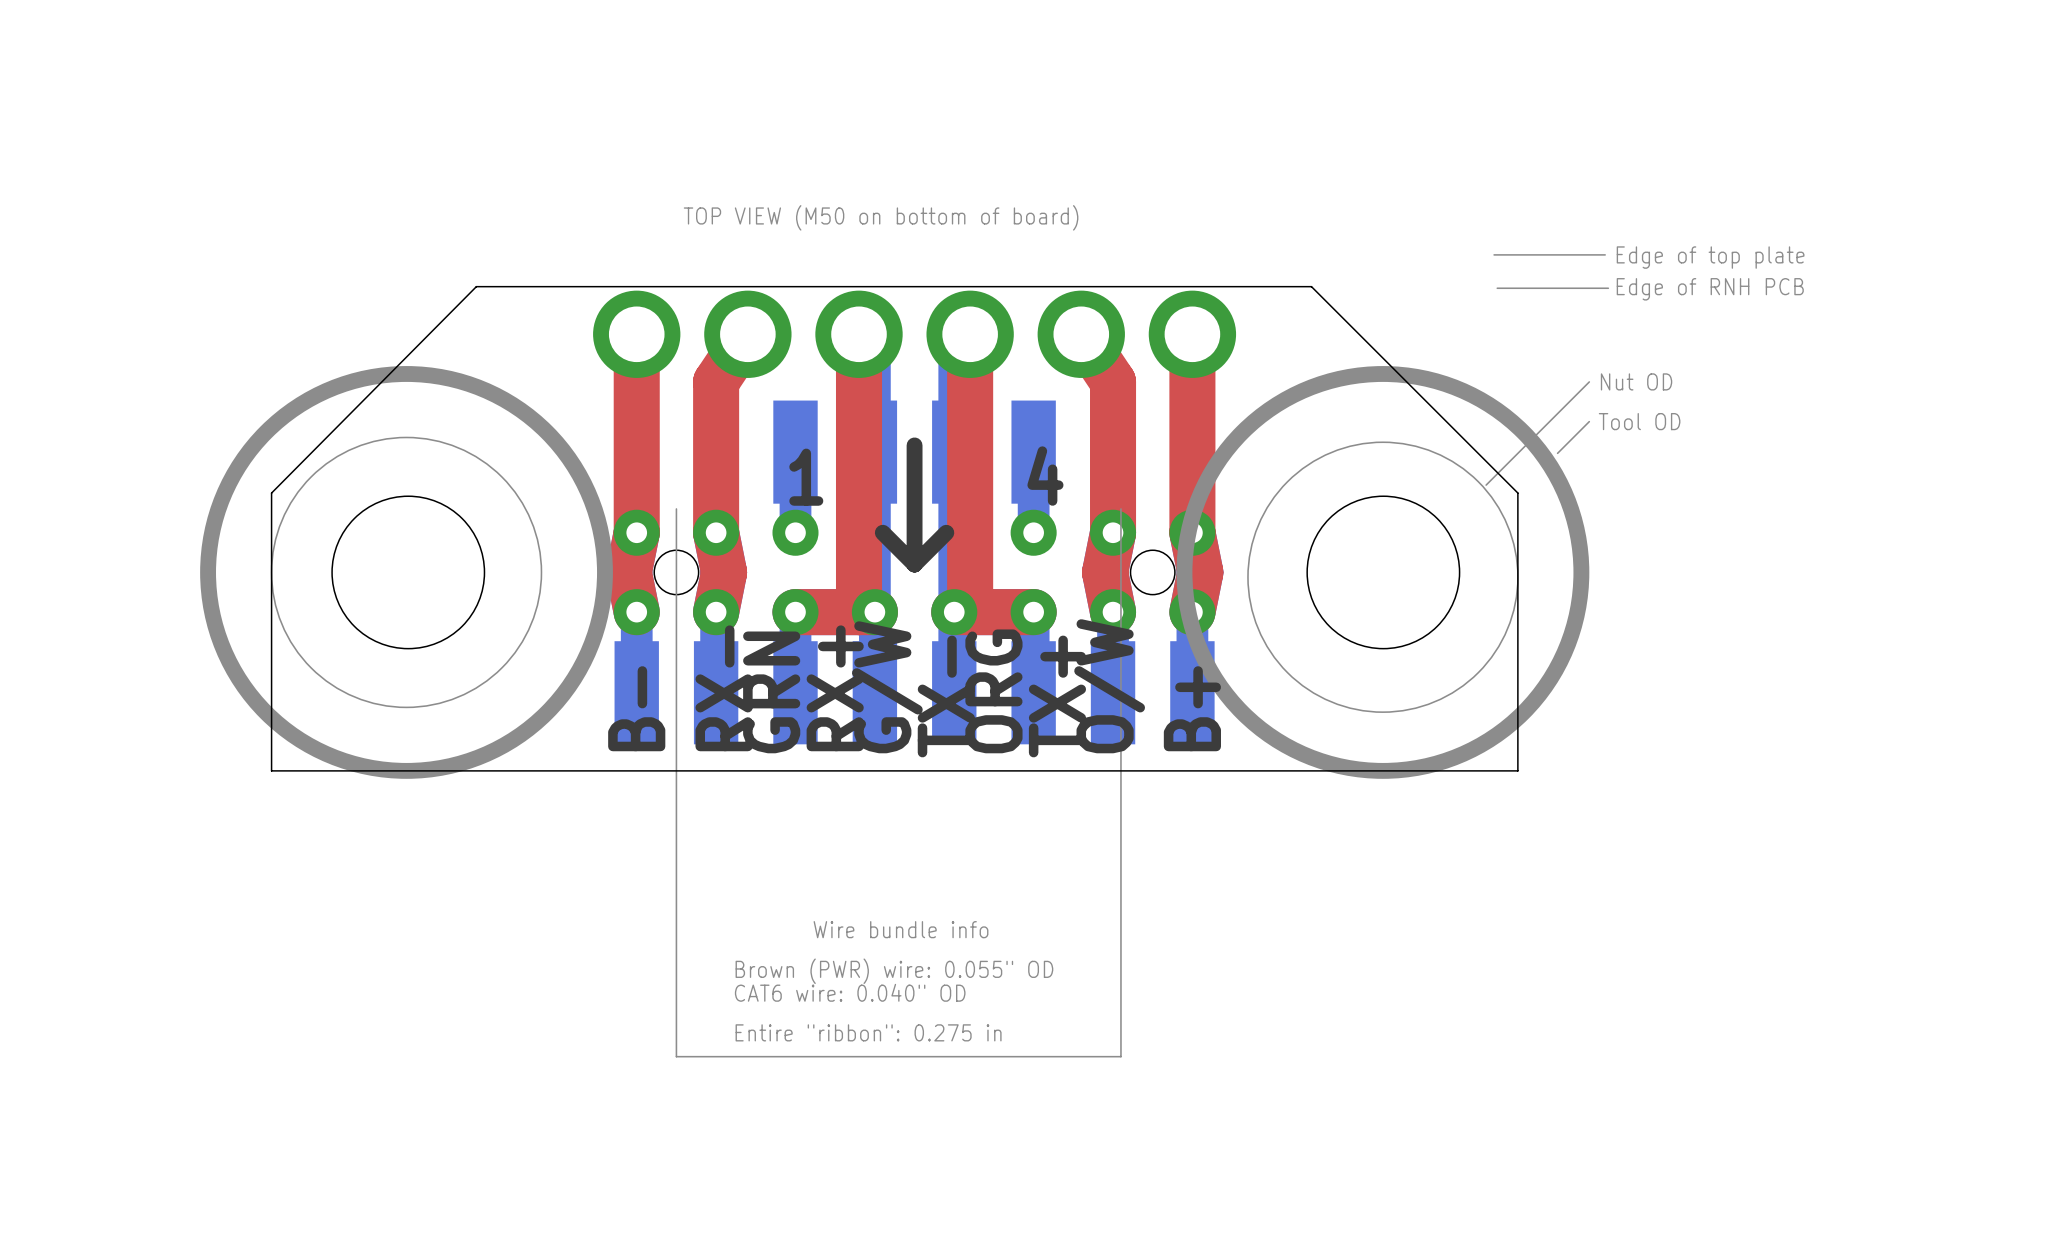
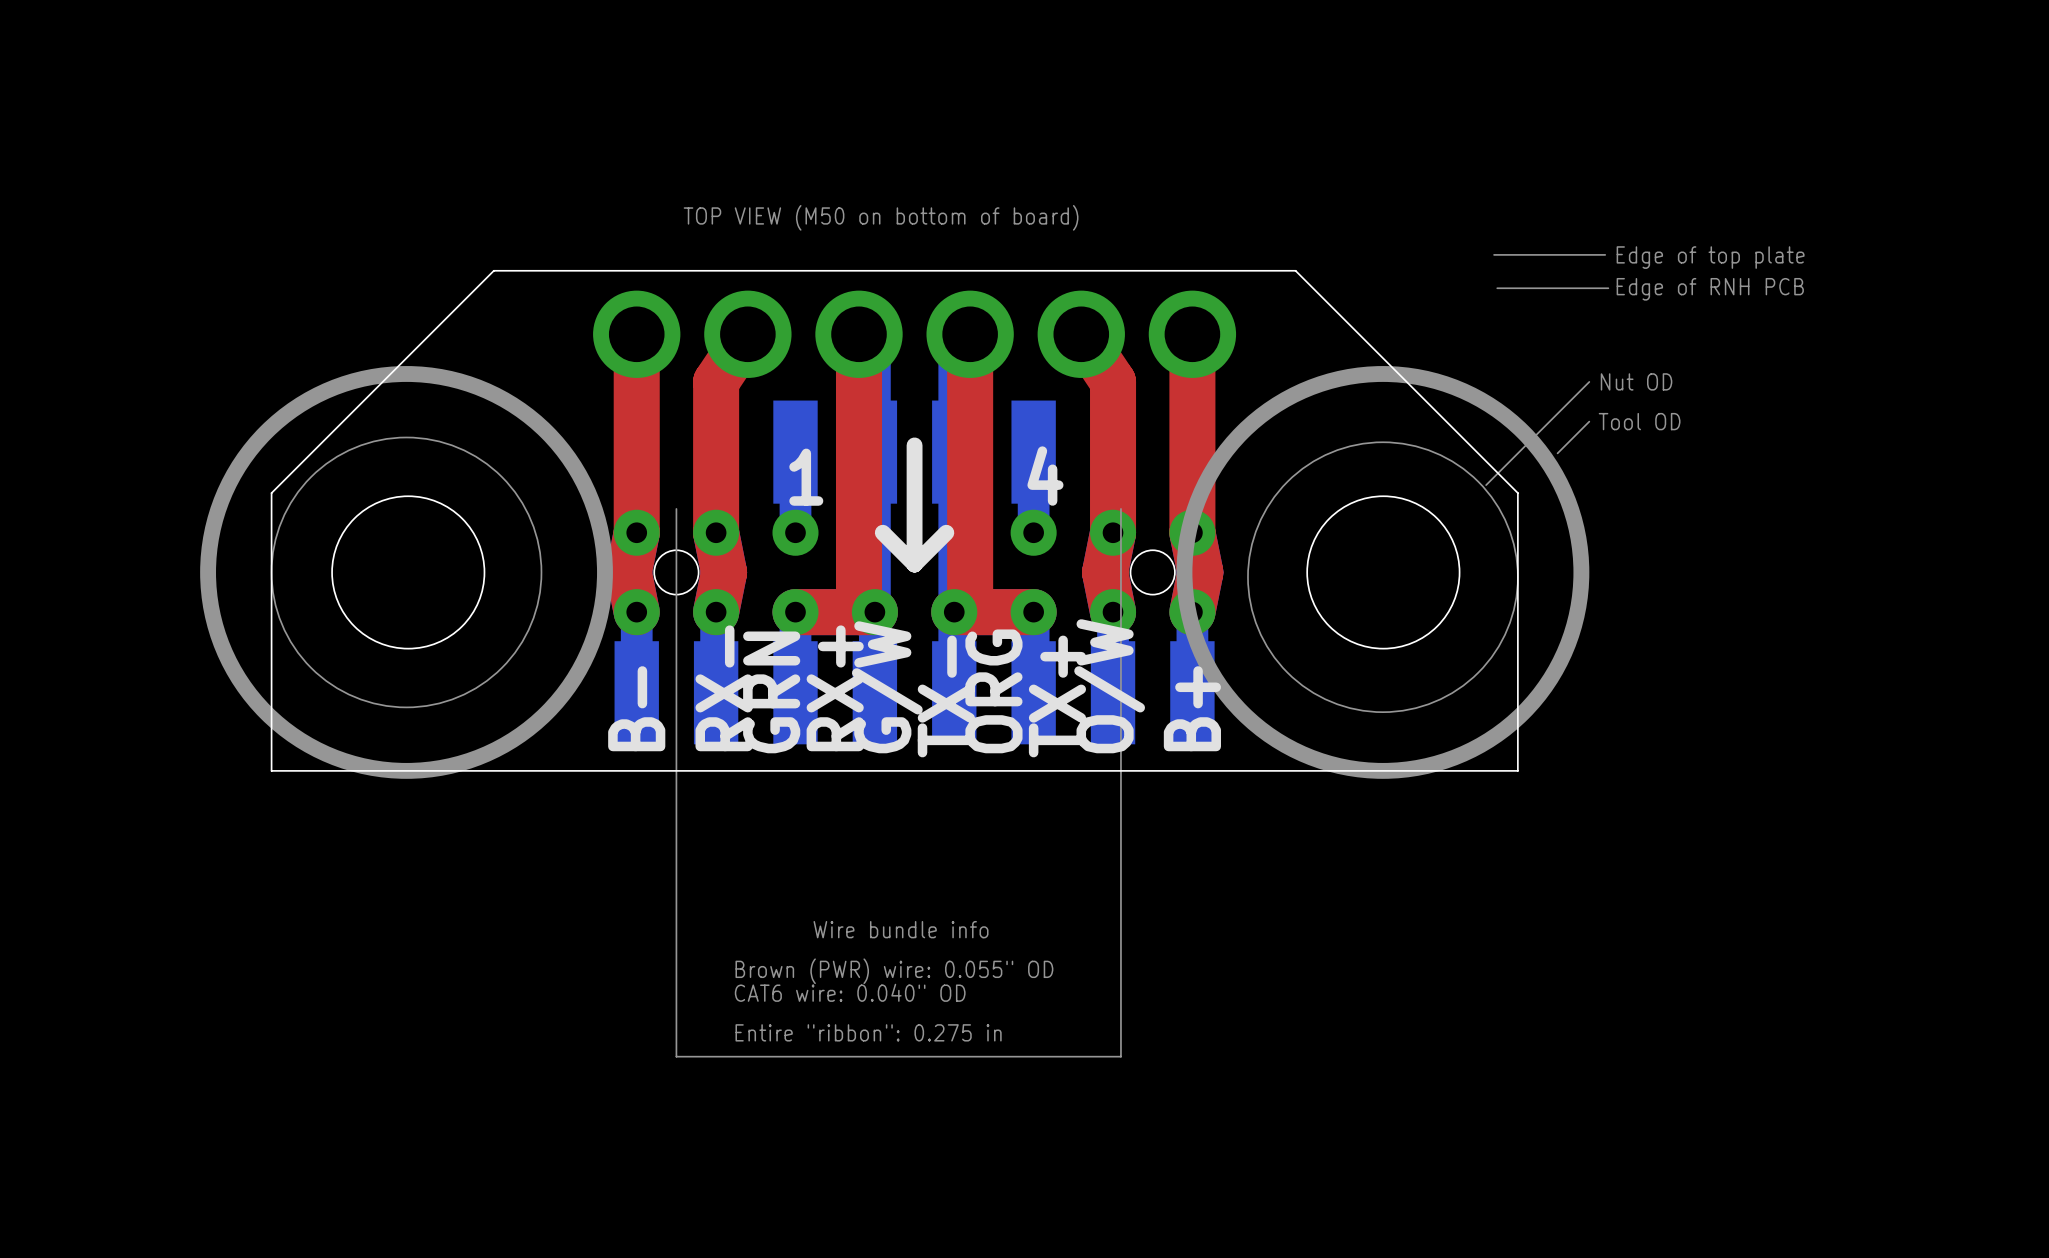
board edge: (1311, 286) (476, 286) (271, 493) -> (1311, 286) (1295, 270) (493, 270) (271, 493)

